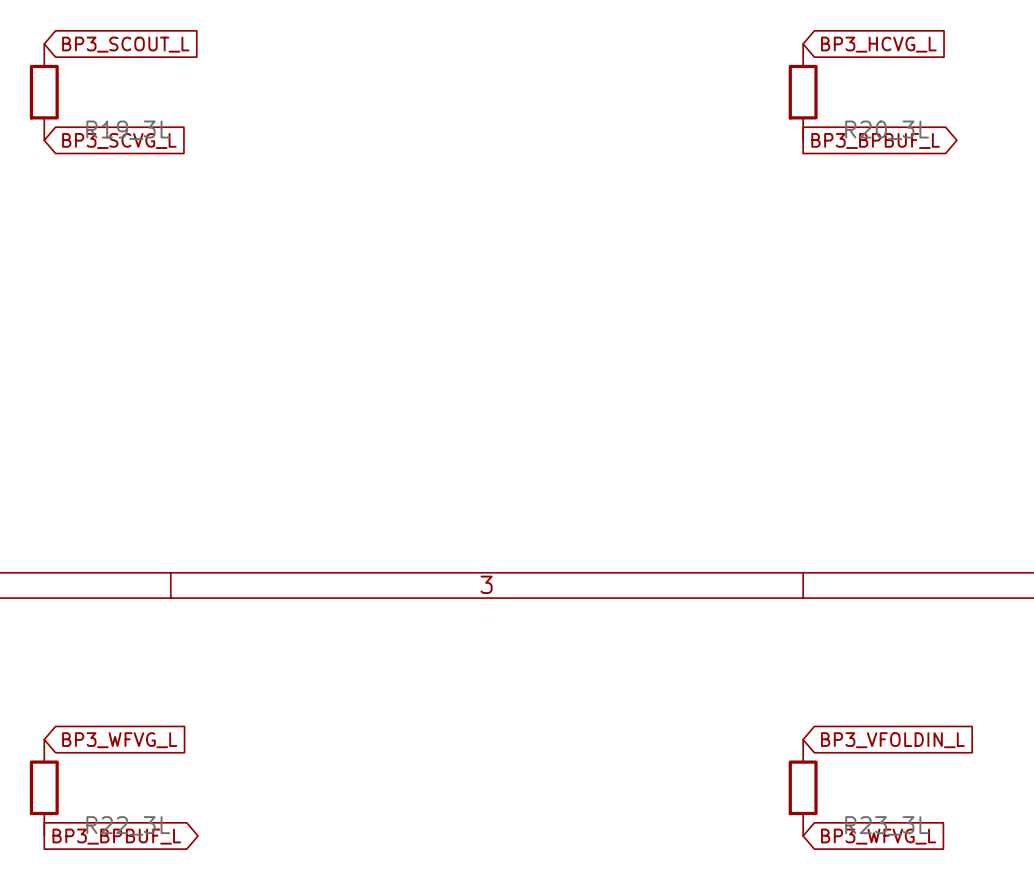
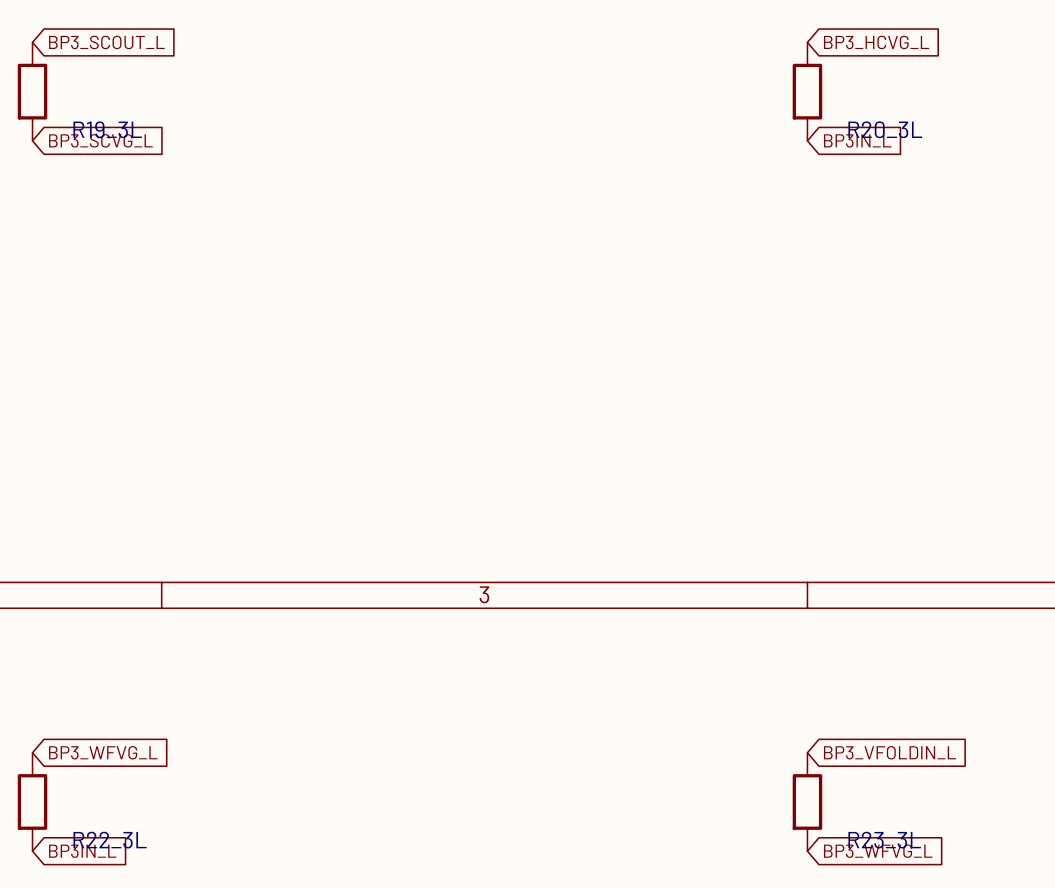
global label shape: output (875, 140) -> input (857, 140)
global label: BP3_BPBUF_L (875, 140) -> BP3IN_L (857, 140)
global label shape: output (116, 836) -> input (82, 851)
global label: BP3_BPBUF_L (116, 836) -> BP3IN_L (82, 851)

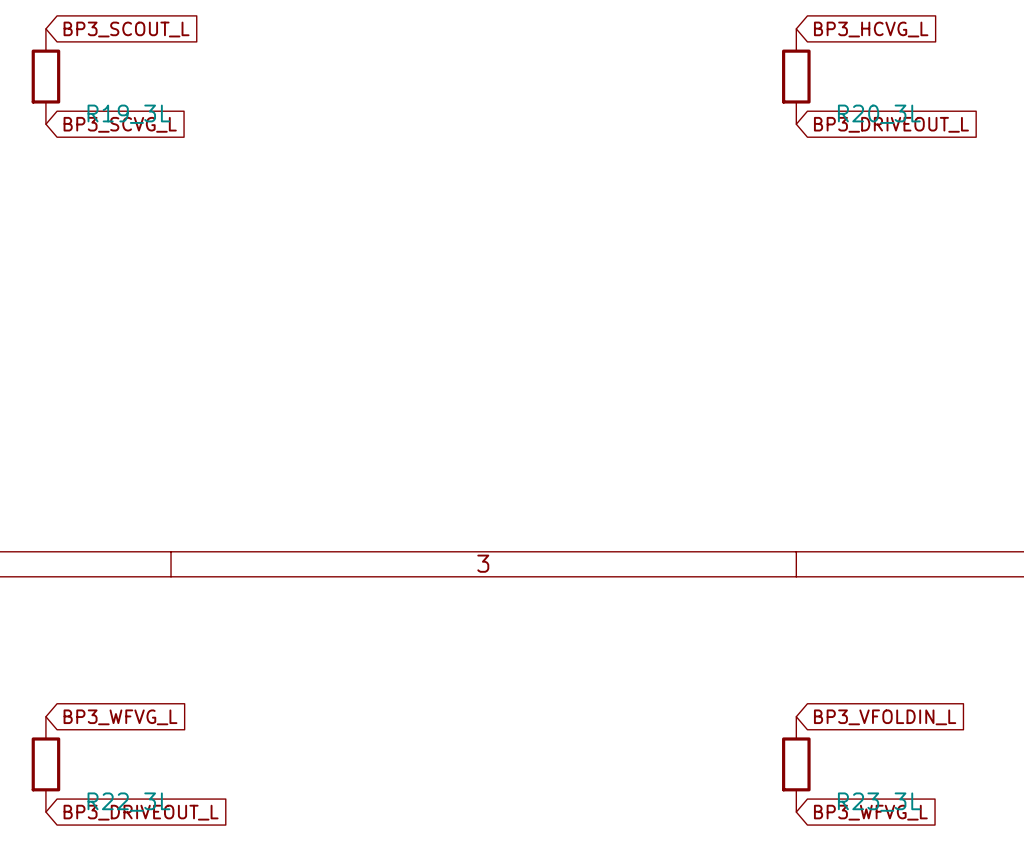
global label: BP3IN_L (857, 140) -> BP3_DRIVEOUT_L (891, 124)
global label: BP3IN_L (82, 851) -> BP3_DRIVEOUT_L (141, 812)

